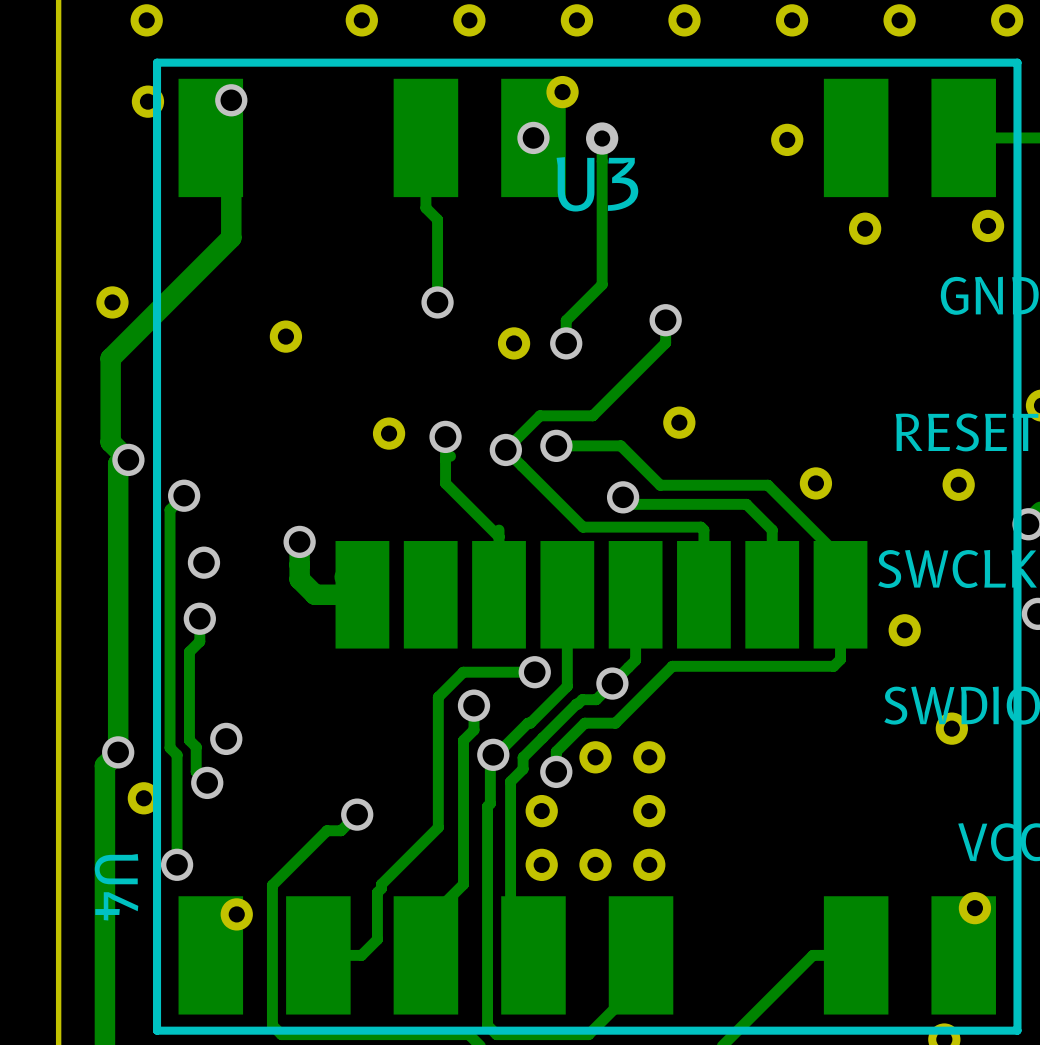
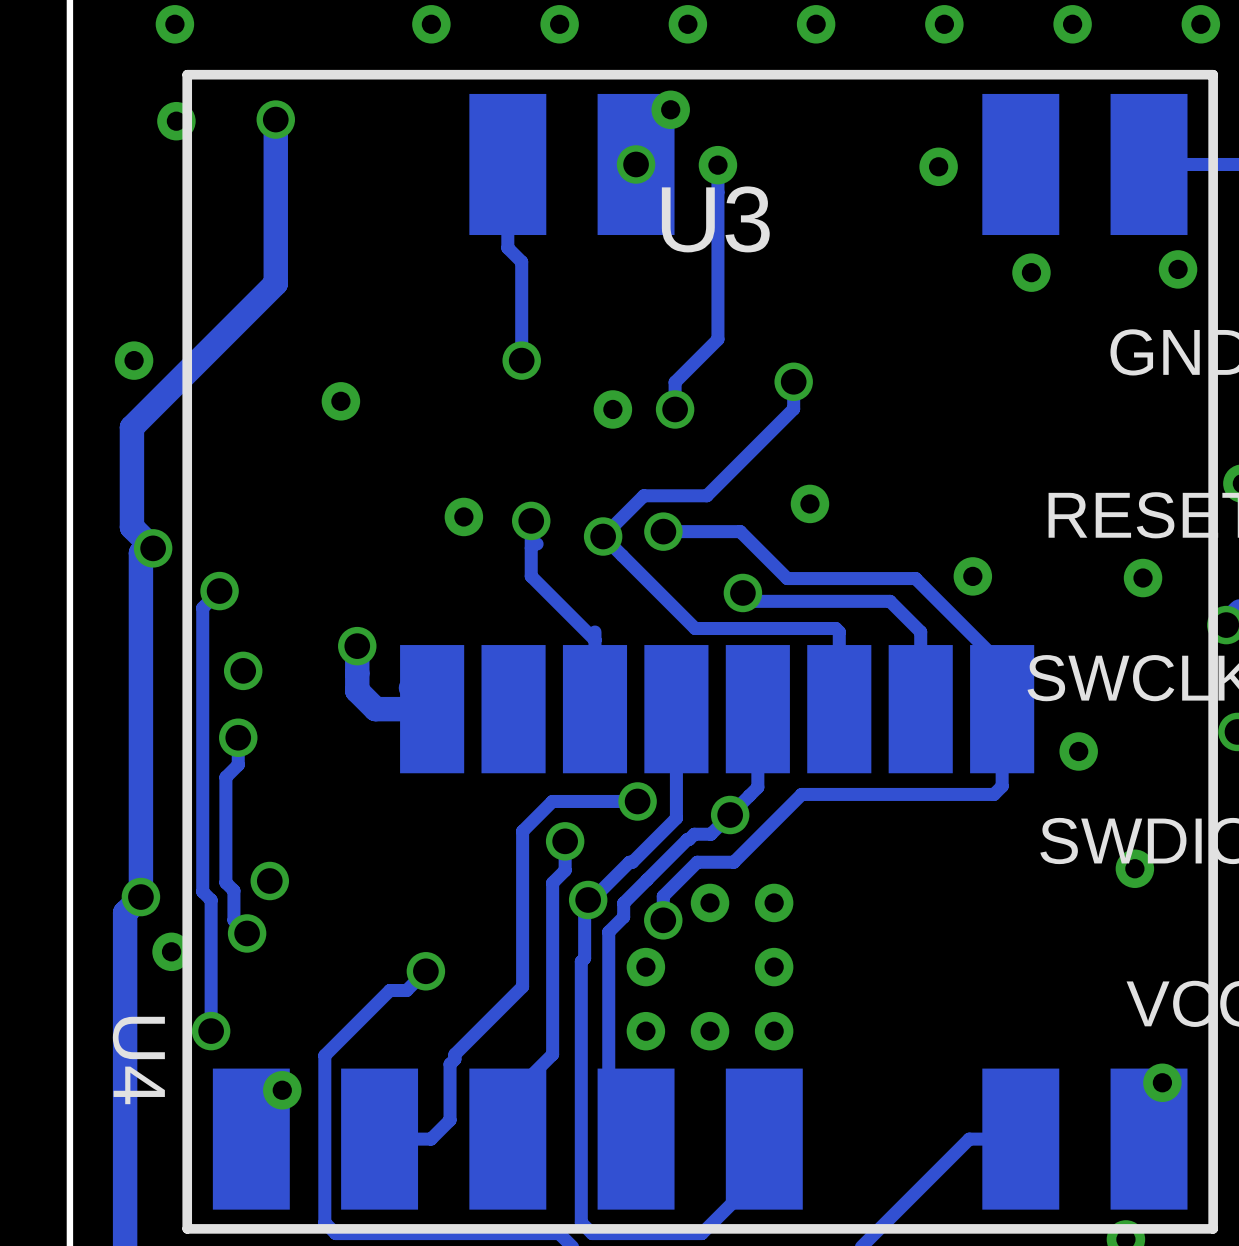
U4 footprint: [152, 58, 1022, 1035] -> [182, 69, 1218, 1234]

